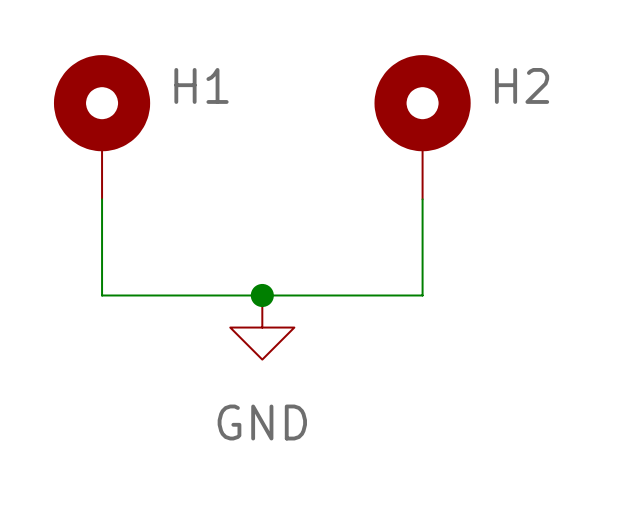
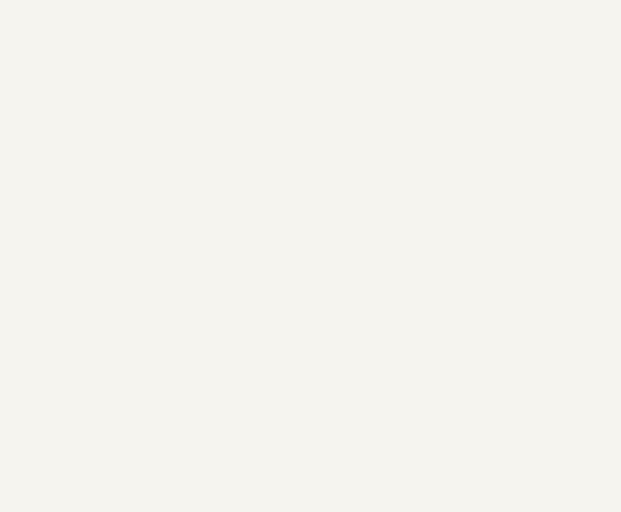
H1: (102, 127) -> none
H2: (422, 127) -> none
wire: (102, 199) (102, 295) (422, 295) (422, 199) -> none
junction: (262, 295) -> none
power symbol: GND (262, 327) -> none

